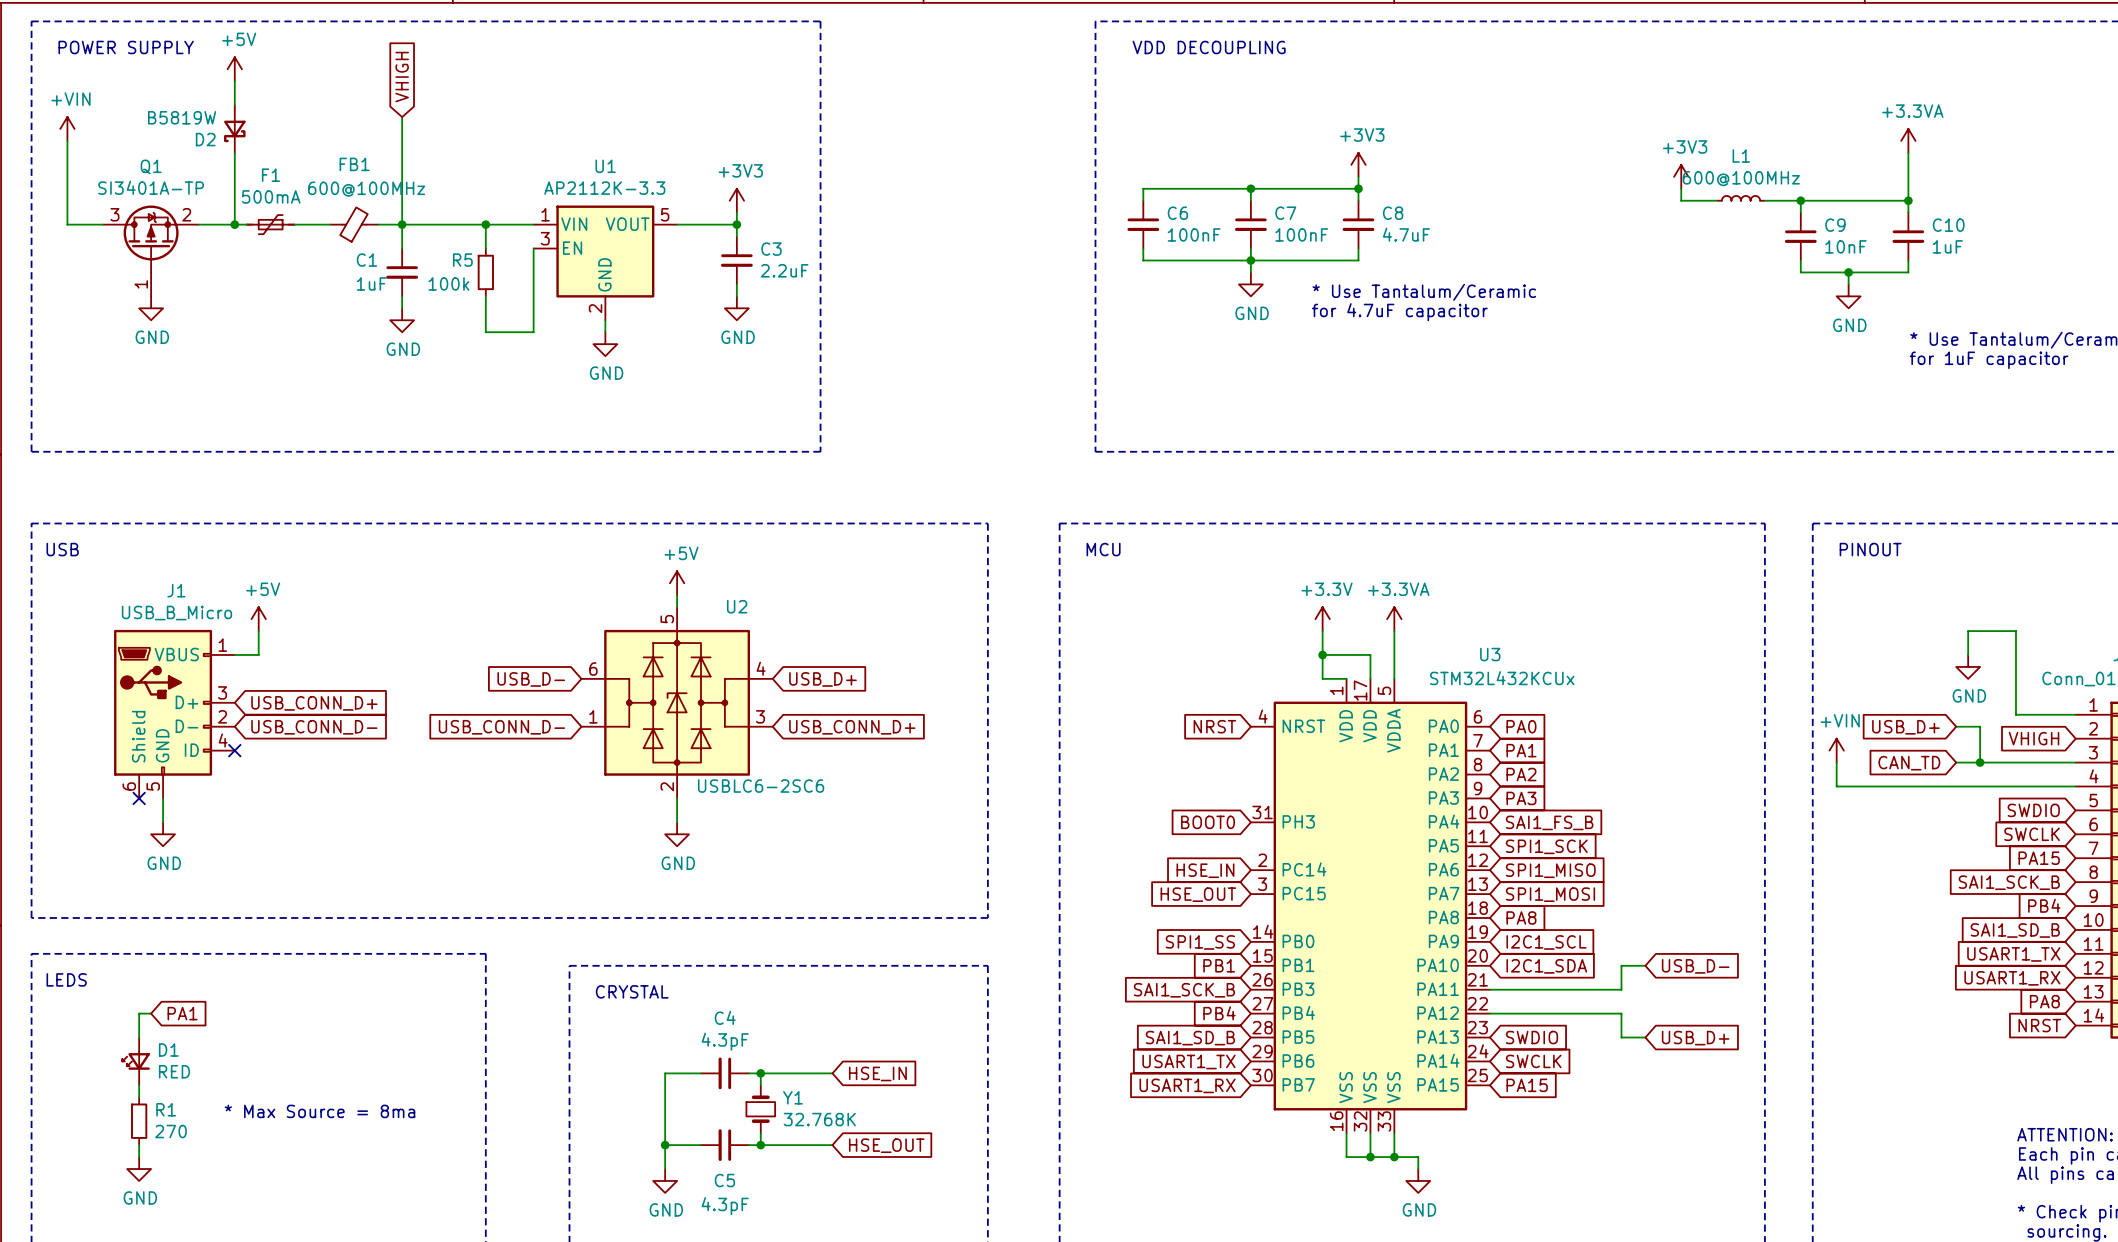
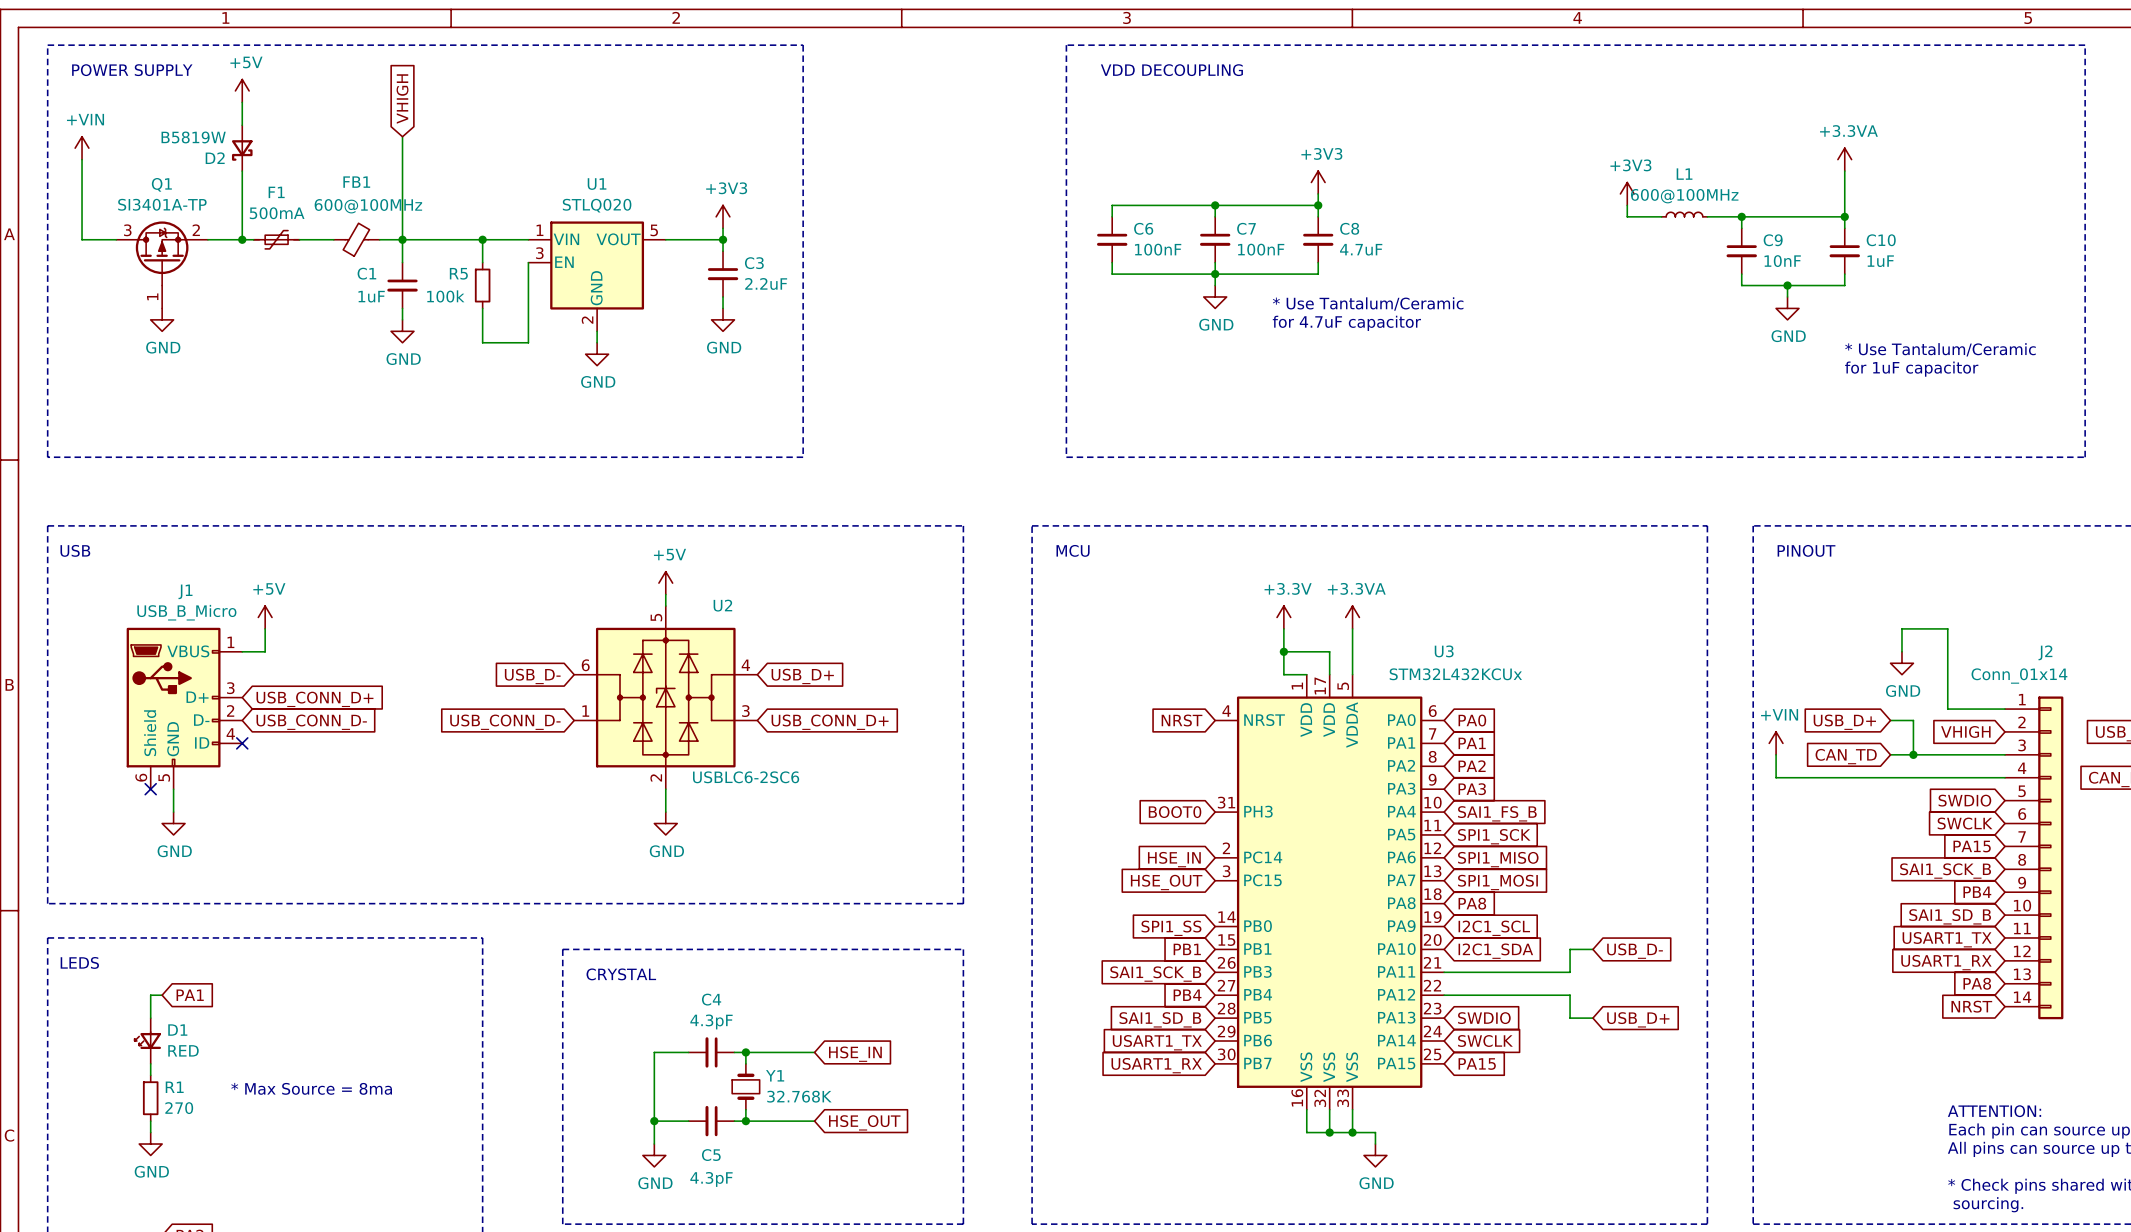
U1 value: AP2112K-3.3 (604, 188) -> STLQ020 (597, 205)

